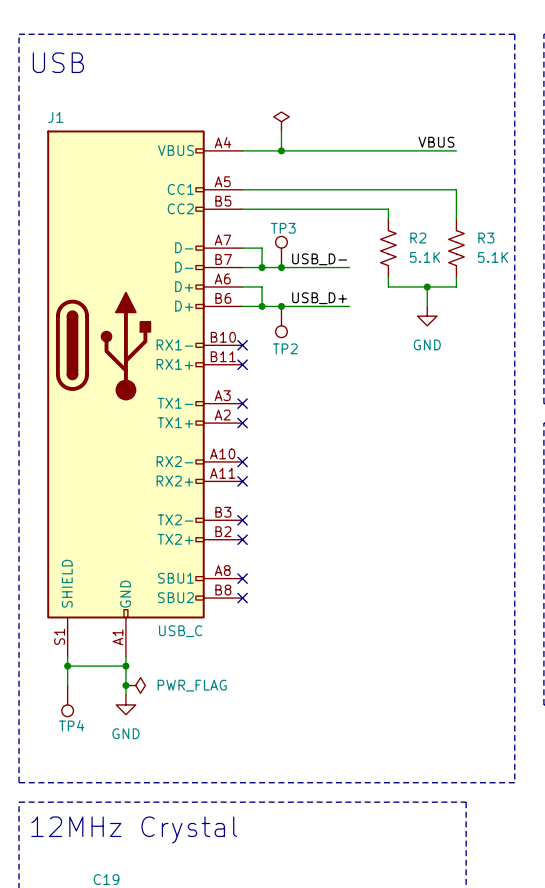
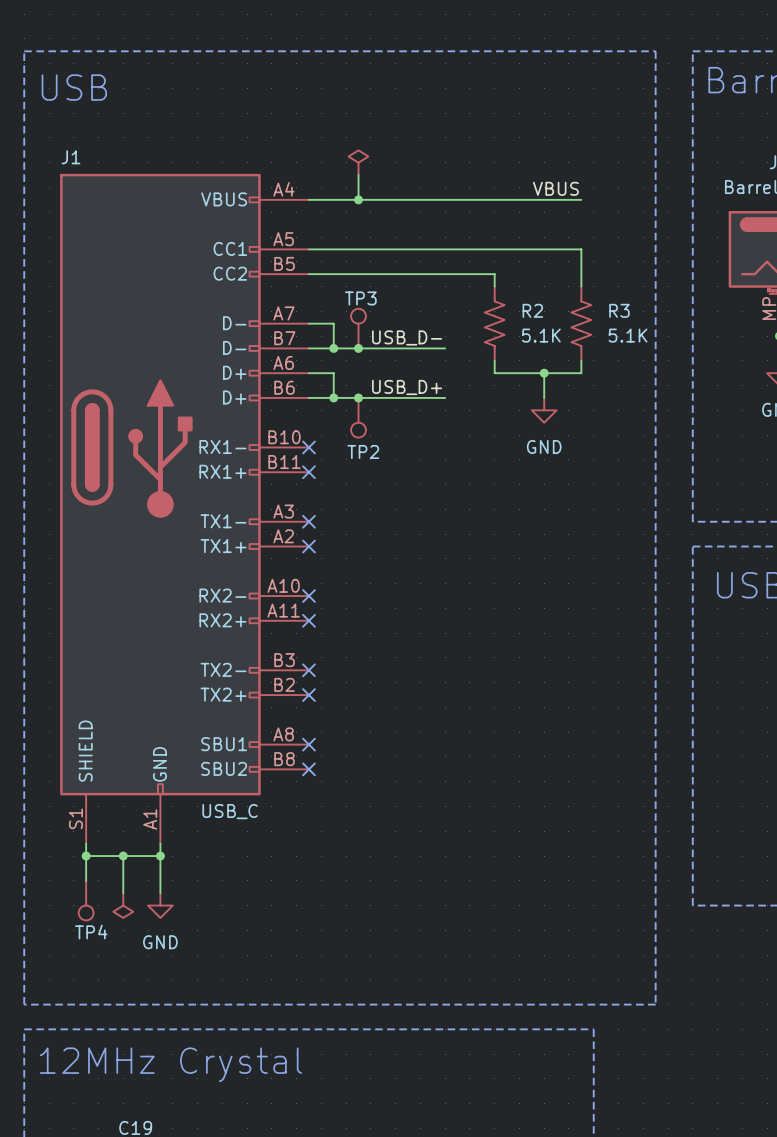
wire: none -> (123, 856) (123, 893)
junction position: (125, 685) -> (123, 856)
power symbol: PWR_FLAG (135, 685) -> none
power symbol: none -> (123, 905)

